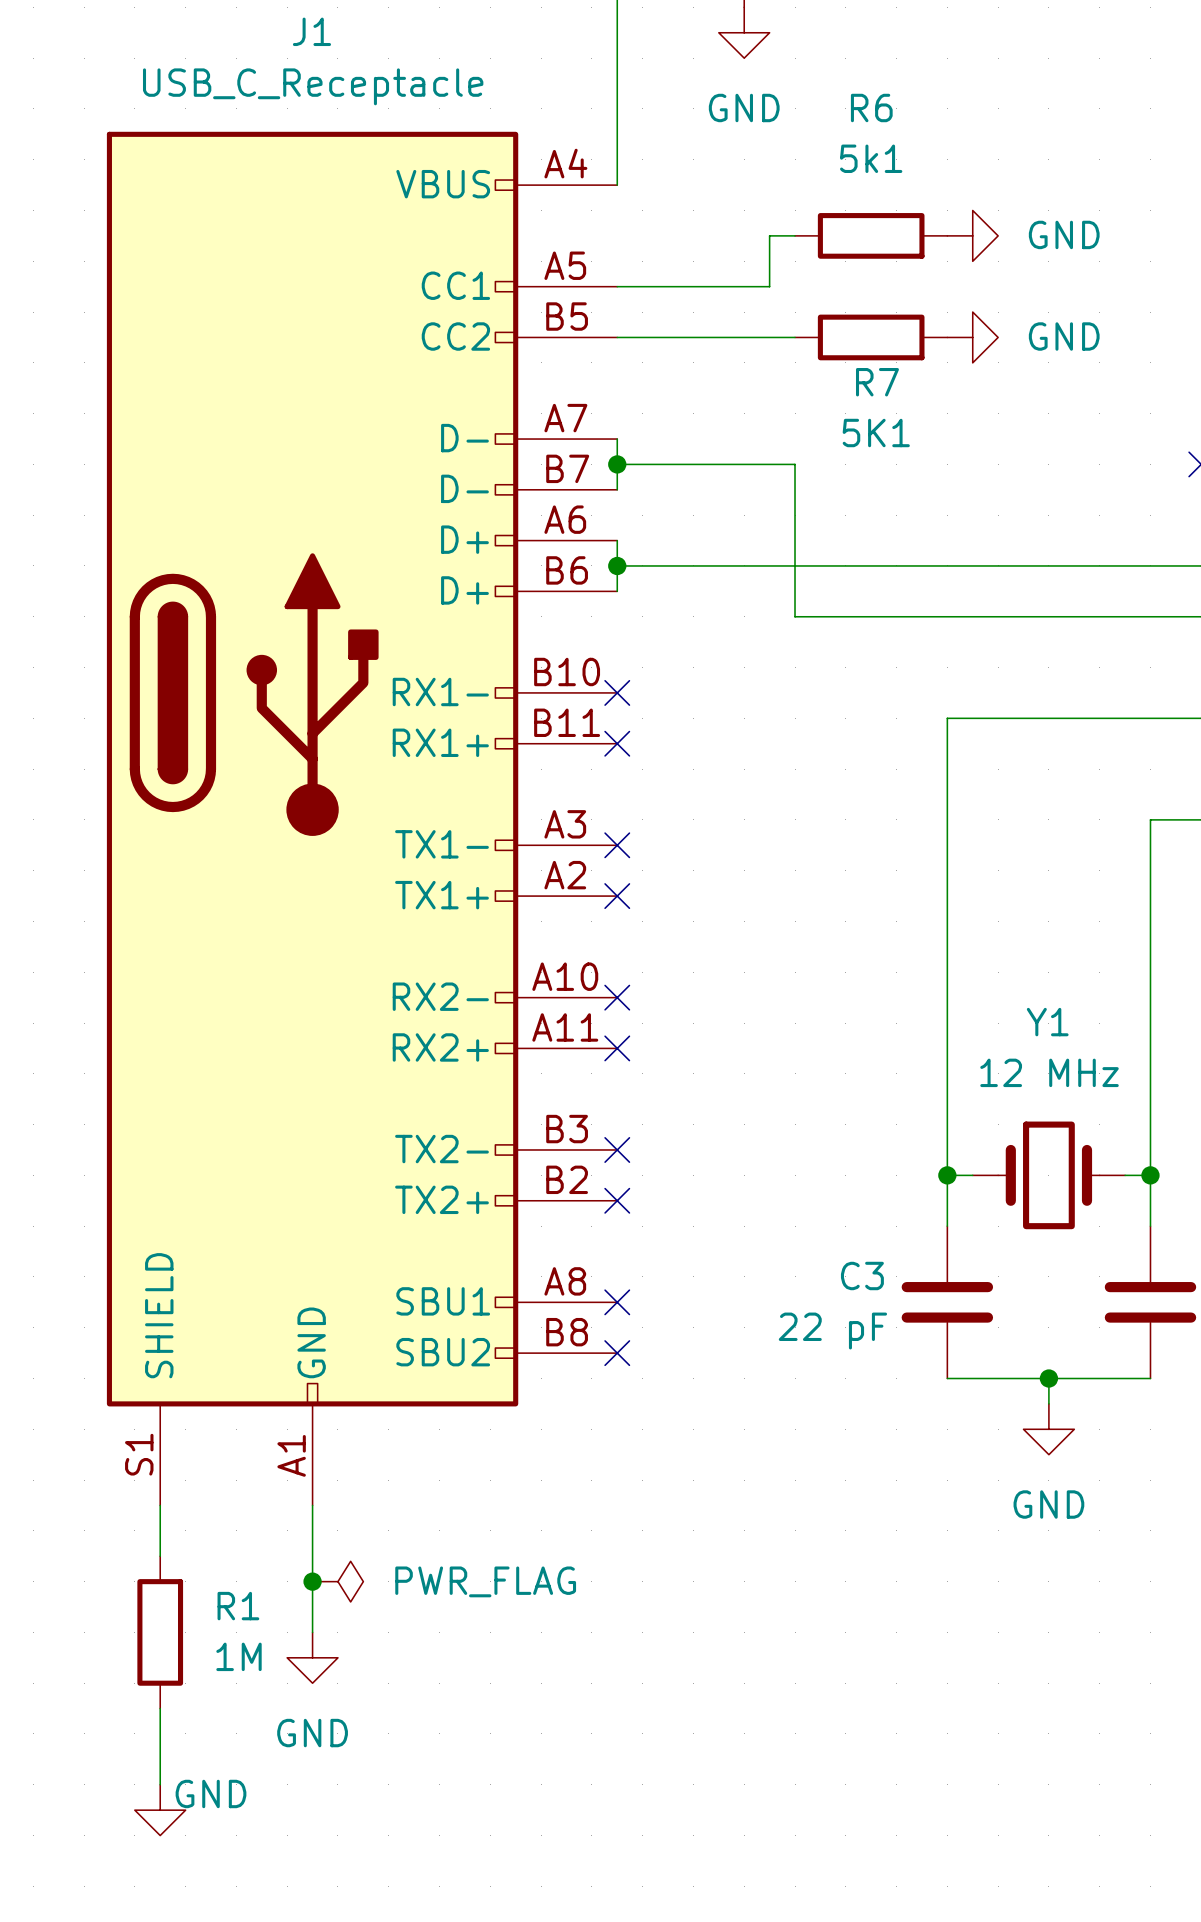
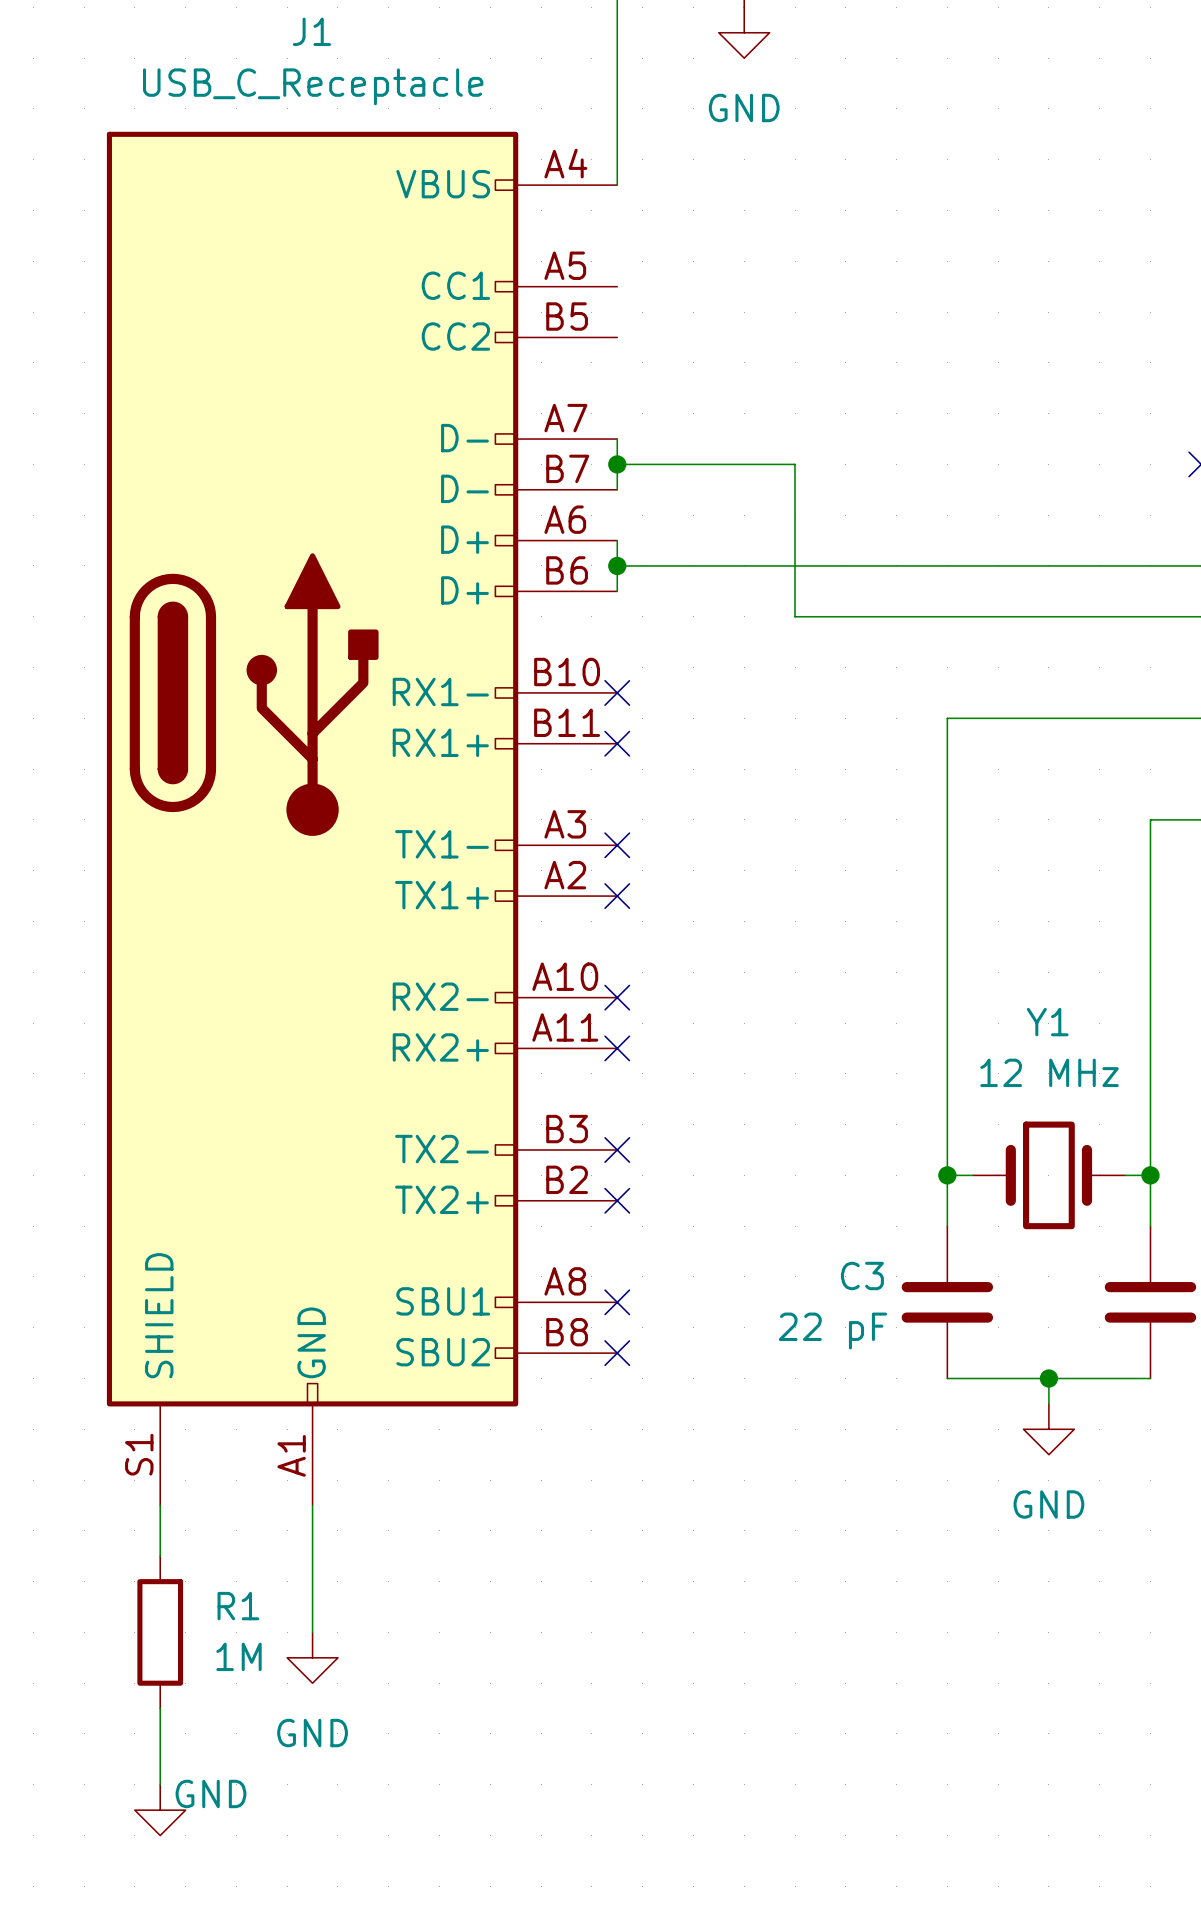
wire: (795, 235) (769, 235) (769, 286) (617, 286) -> none
R6: 5k1 (871, 235) -> none
power symbol: GND (972, 235) -> none
wire: (617, 337) (795, 337) -> none
R7: 5K1 (871, 337) -> none
power symbol: GND (972, 337) -> none
junction: (312, 1581) -> none
power symbol: PWR_FLAG (337, 1581) -> none

